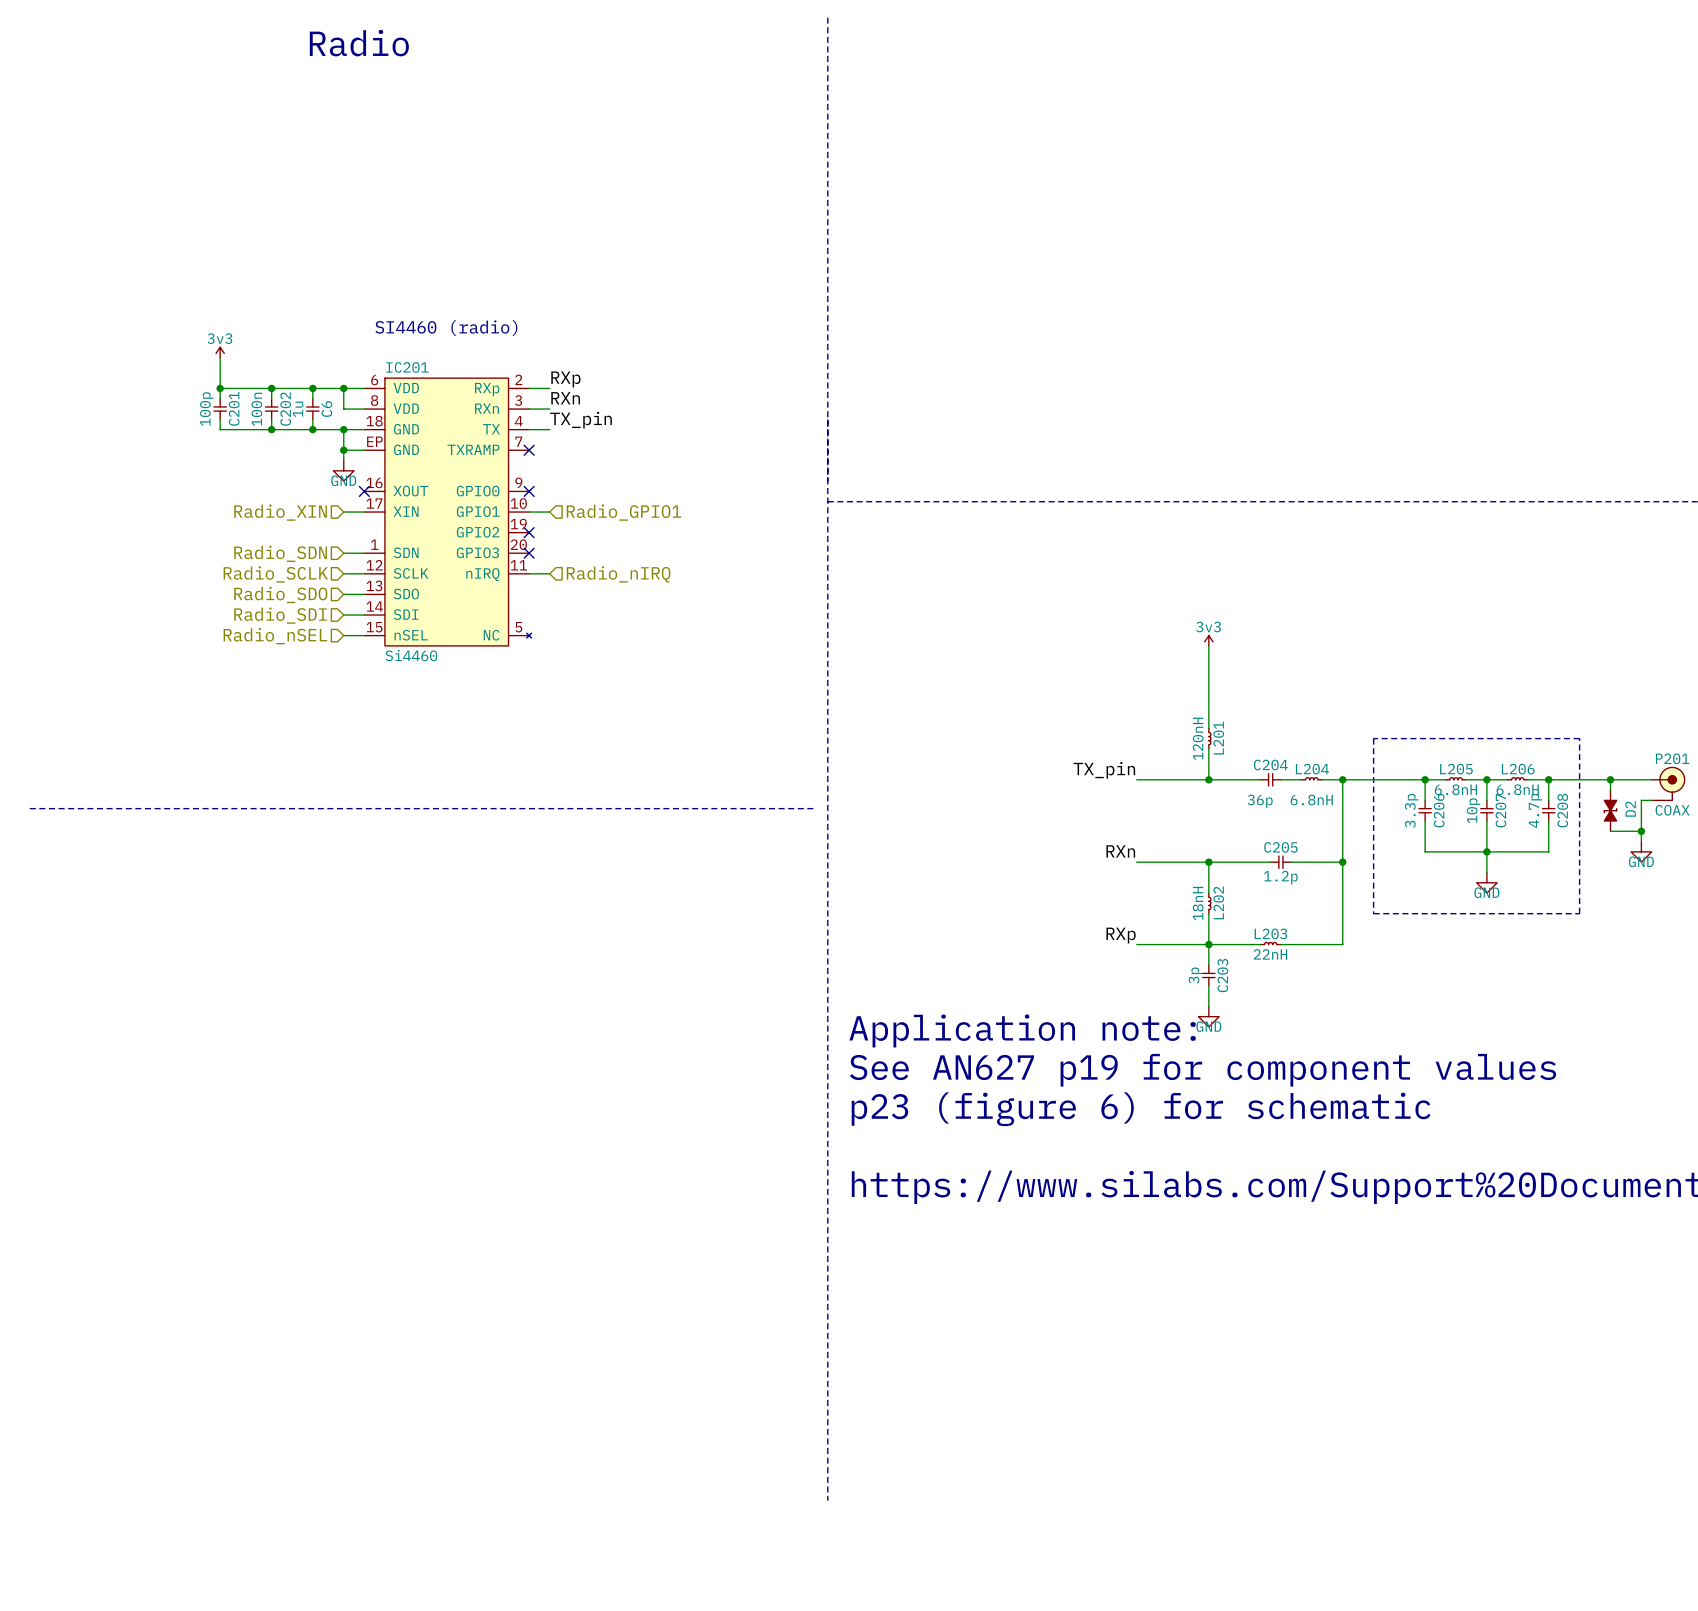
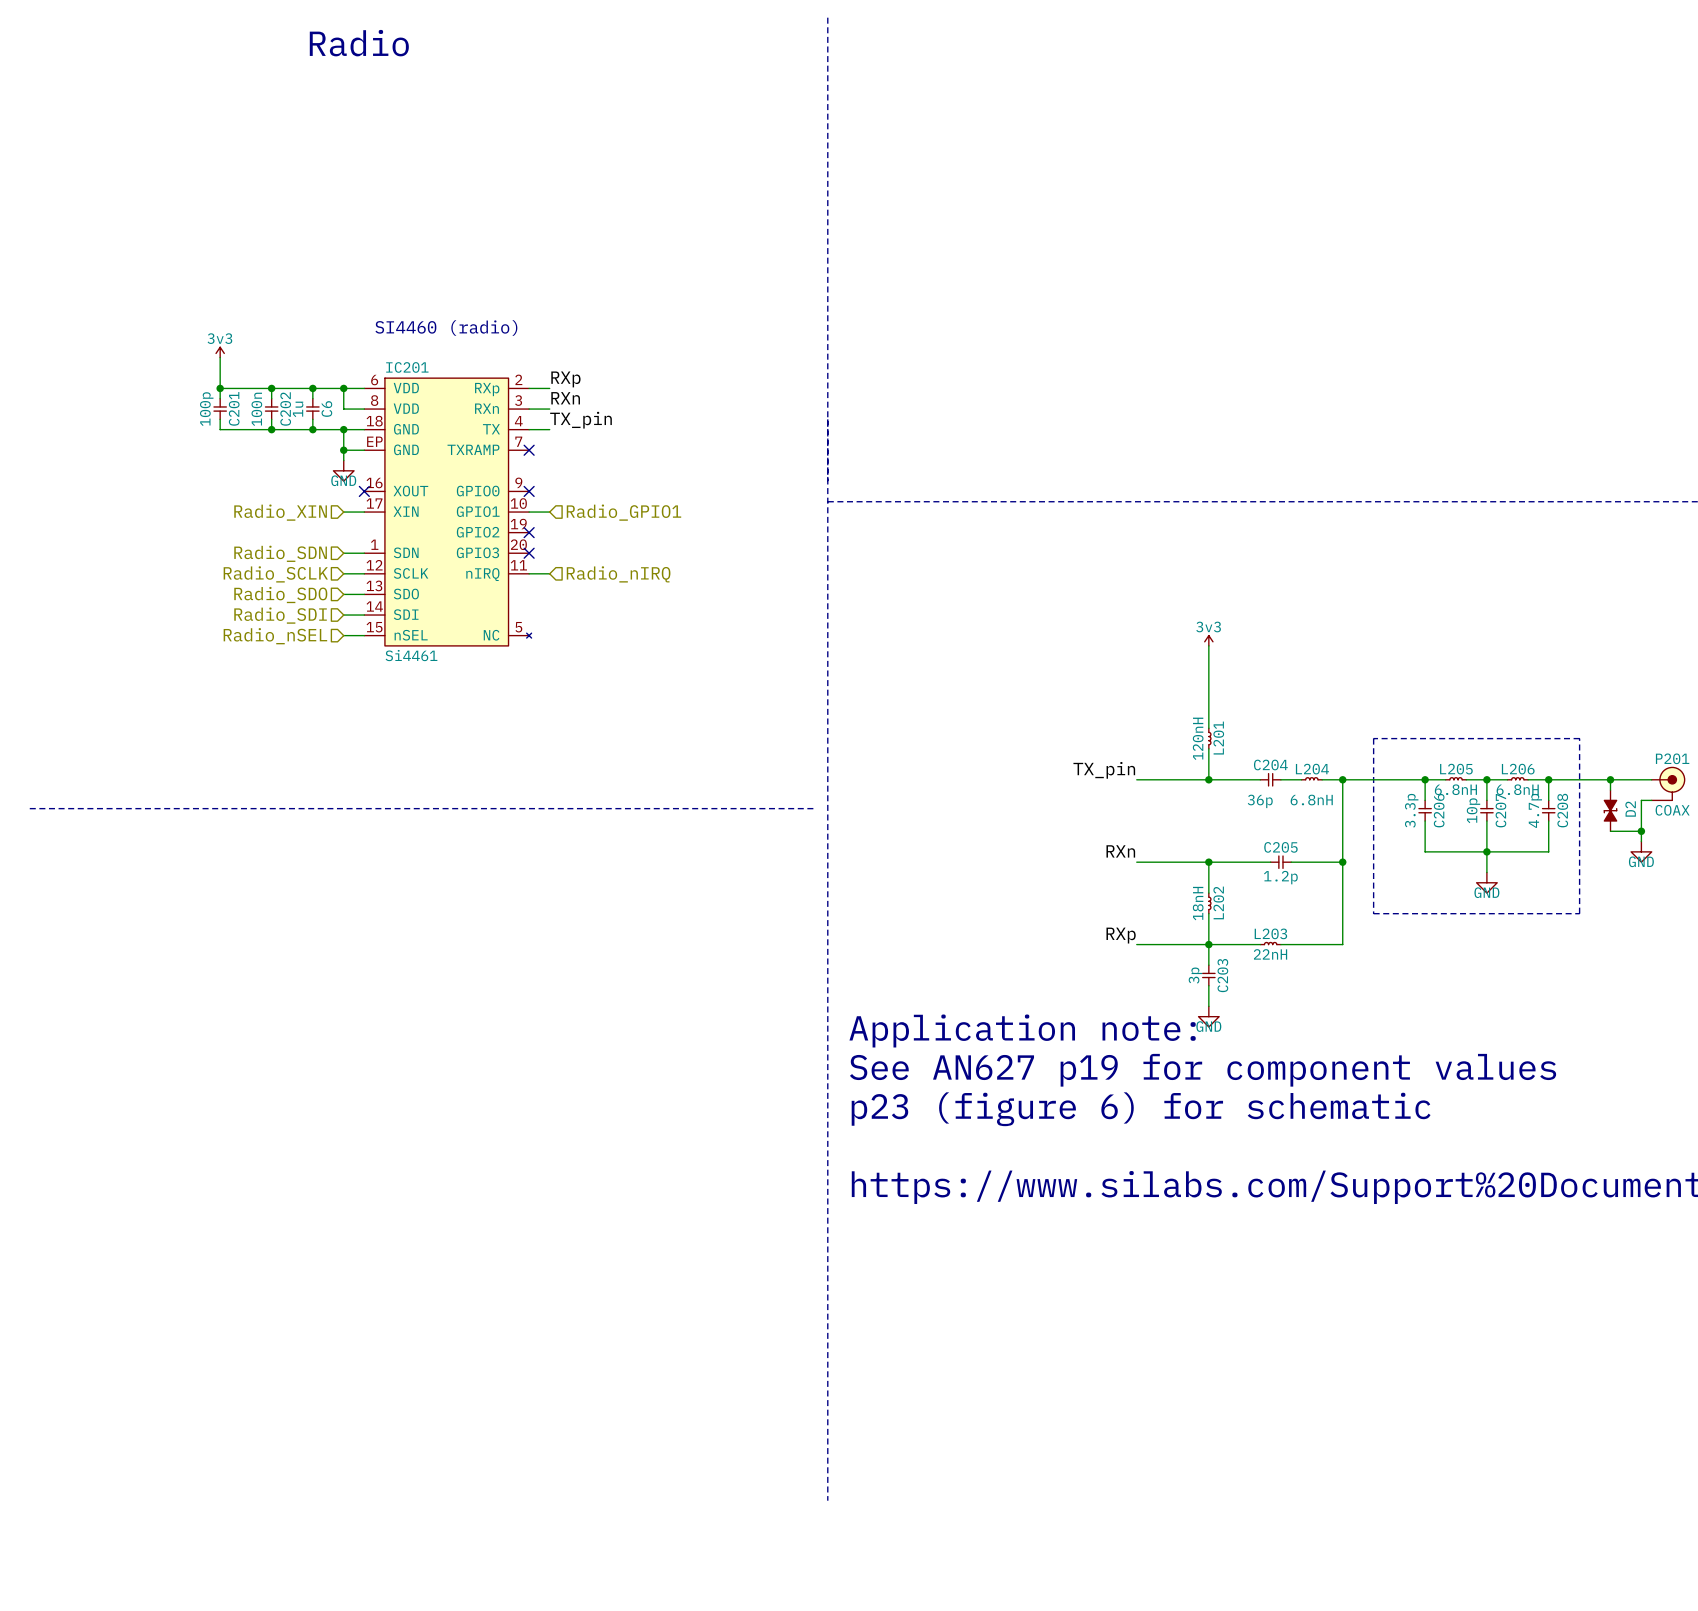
IC201 value: Si4460 (411, 655) -> Si4461 (411, 655)

